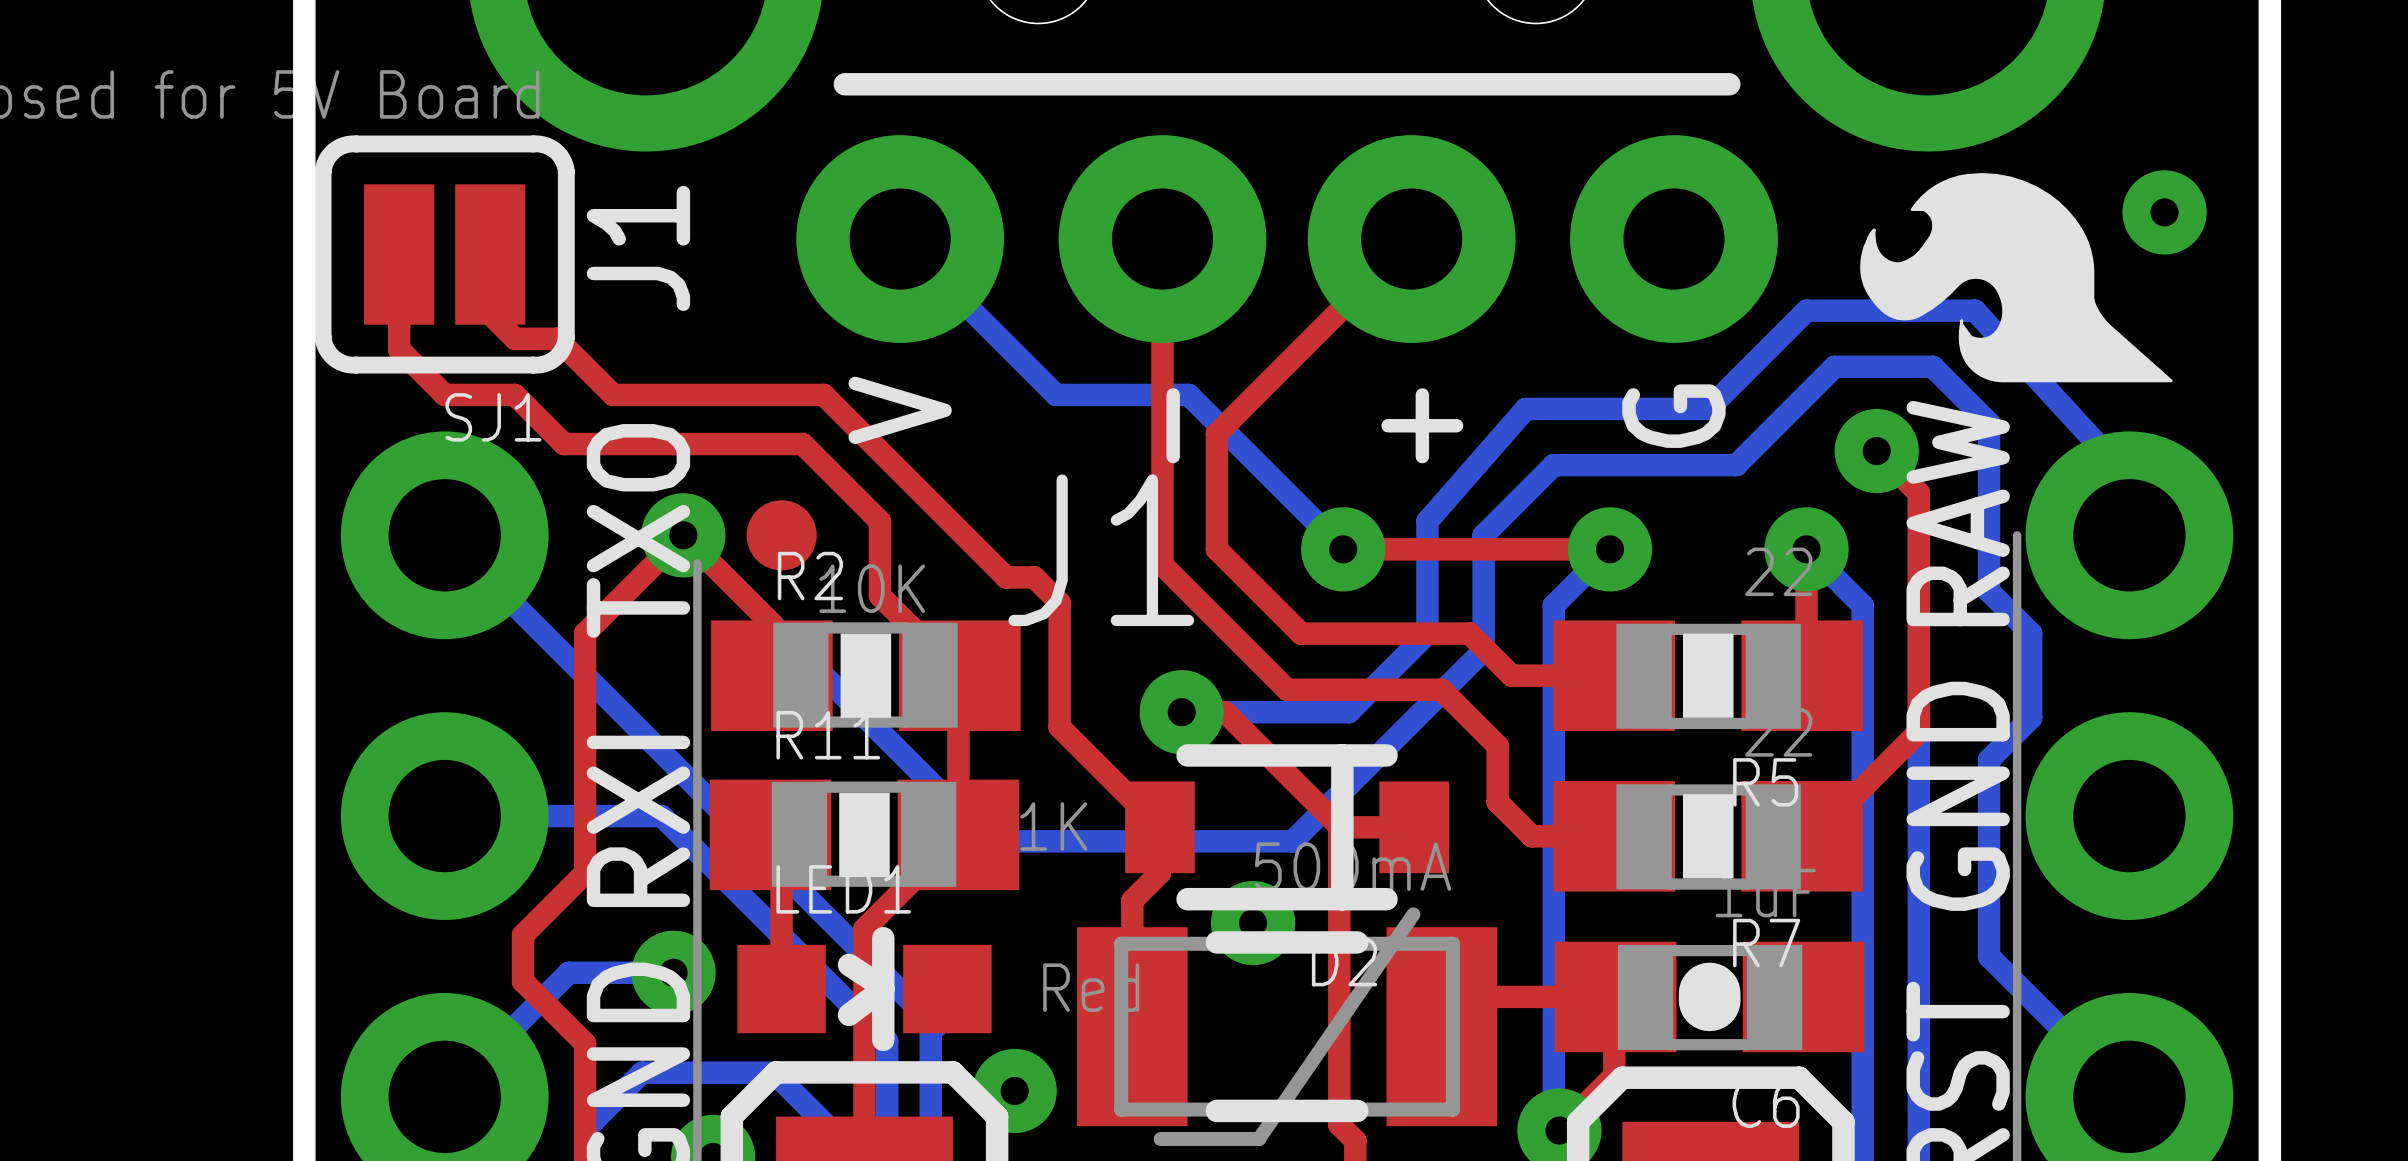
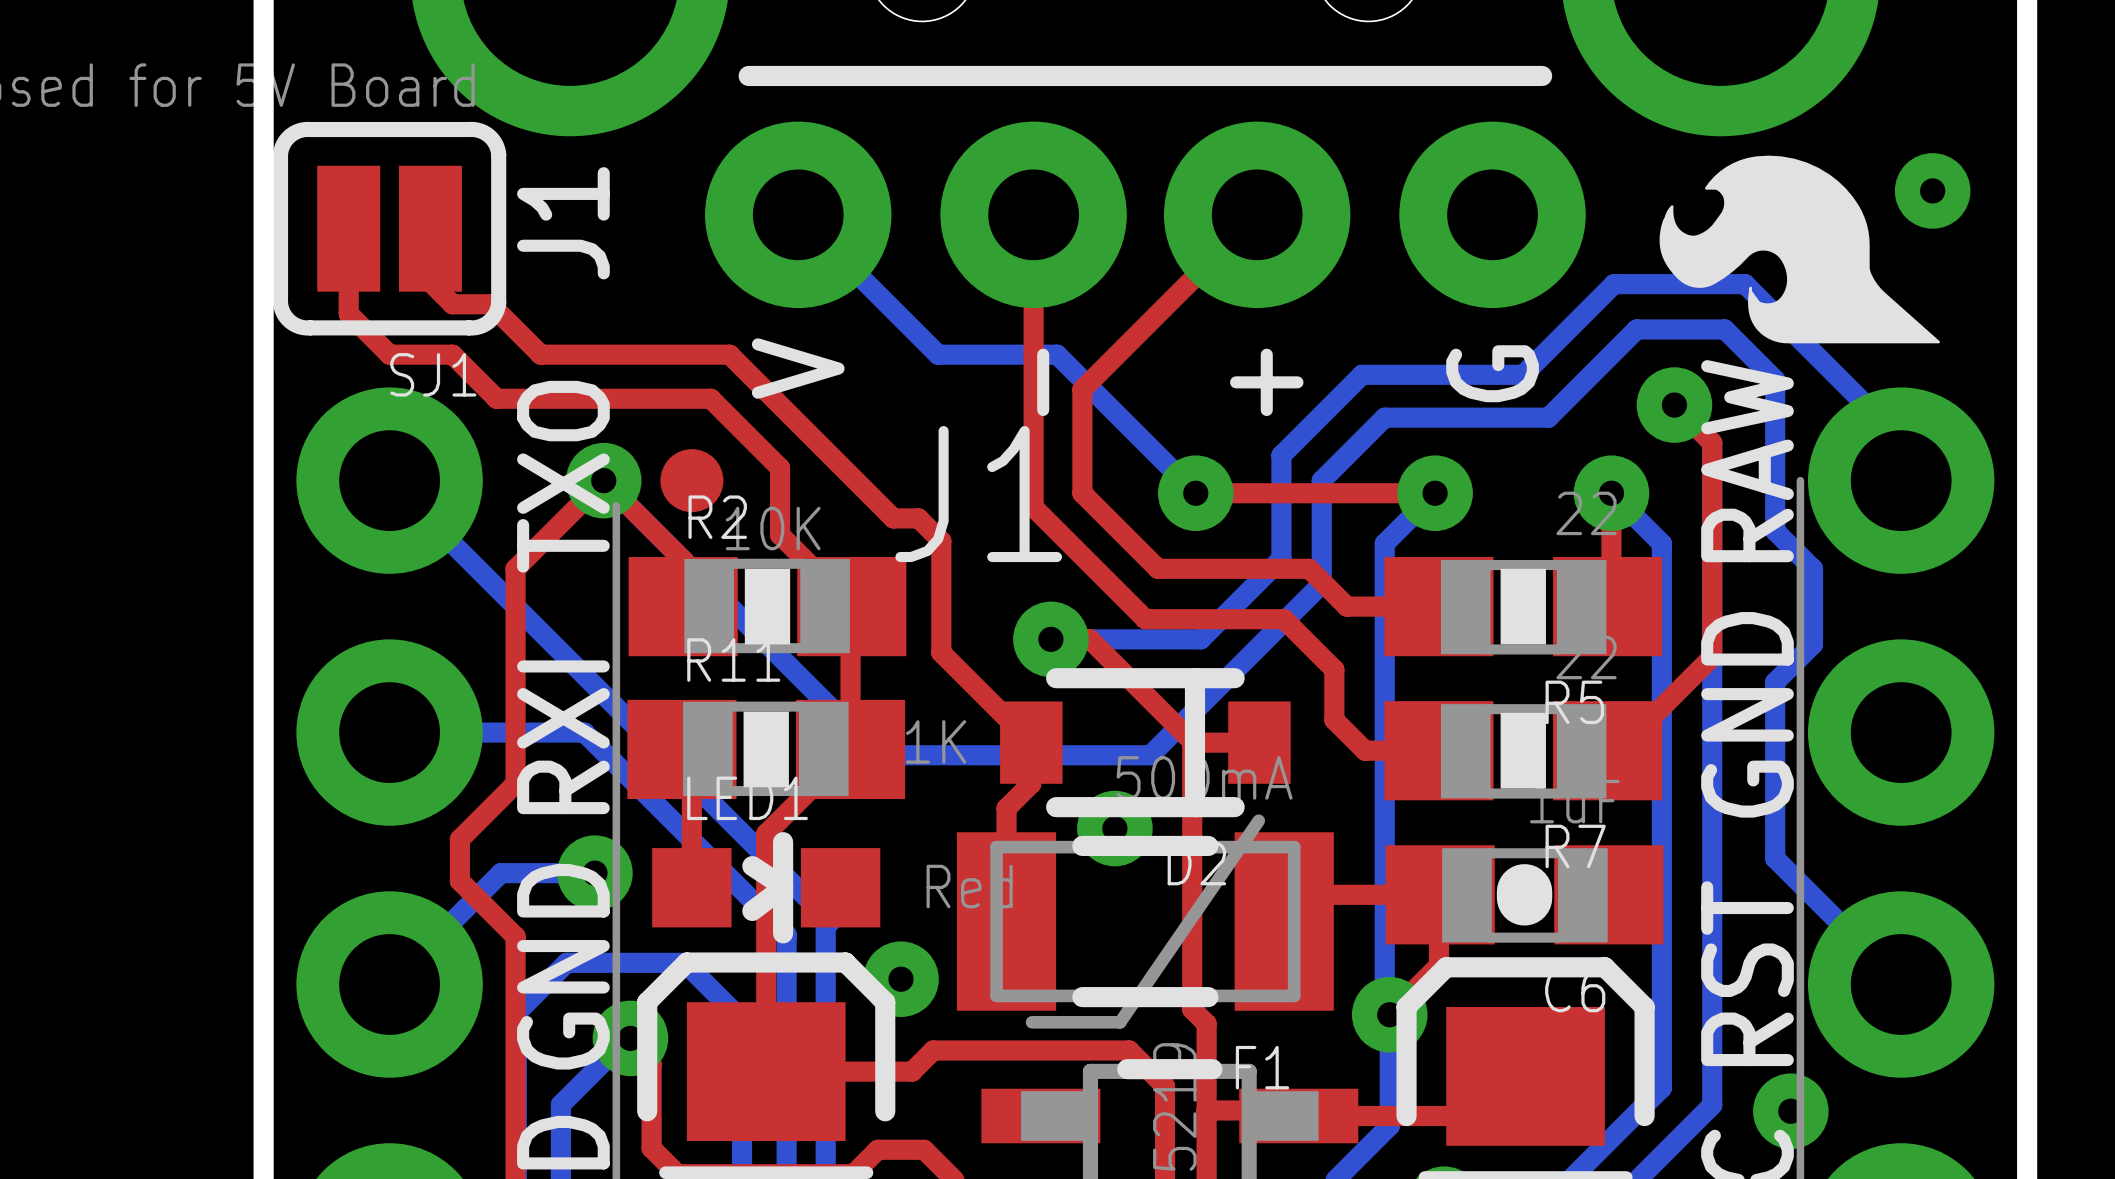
bottom track: (2129, 490) (2129, 479) (1975, 310) (1806, 310) (1708, 408) (1525, 408) (1427, 521) (1427, 633) -> (1901, 440) (1744, 284) (1613, 284) (1523, 374) (1362, 374) (1281, 455) (1281, 558) (1271, 568)

